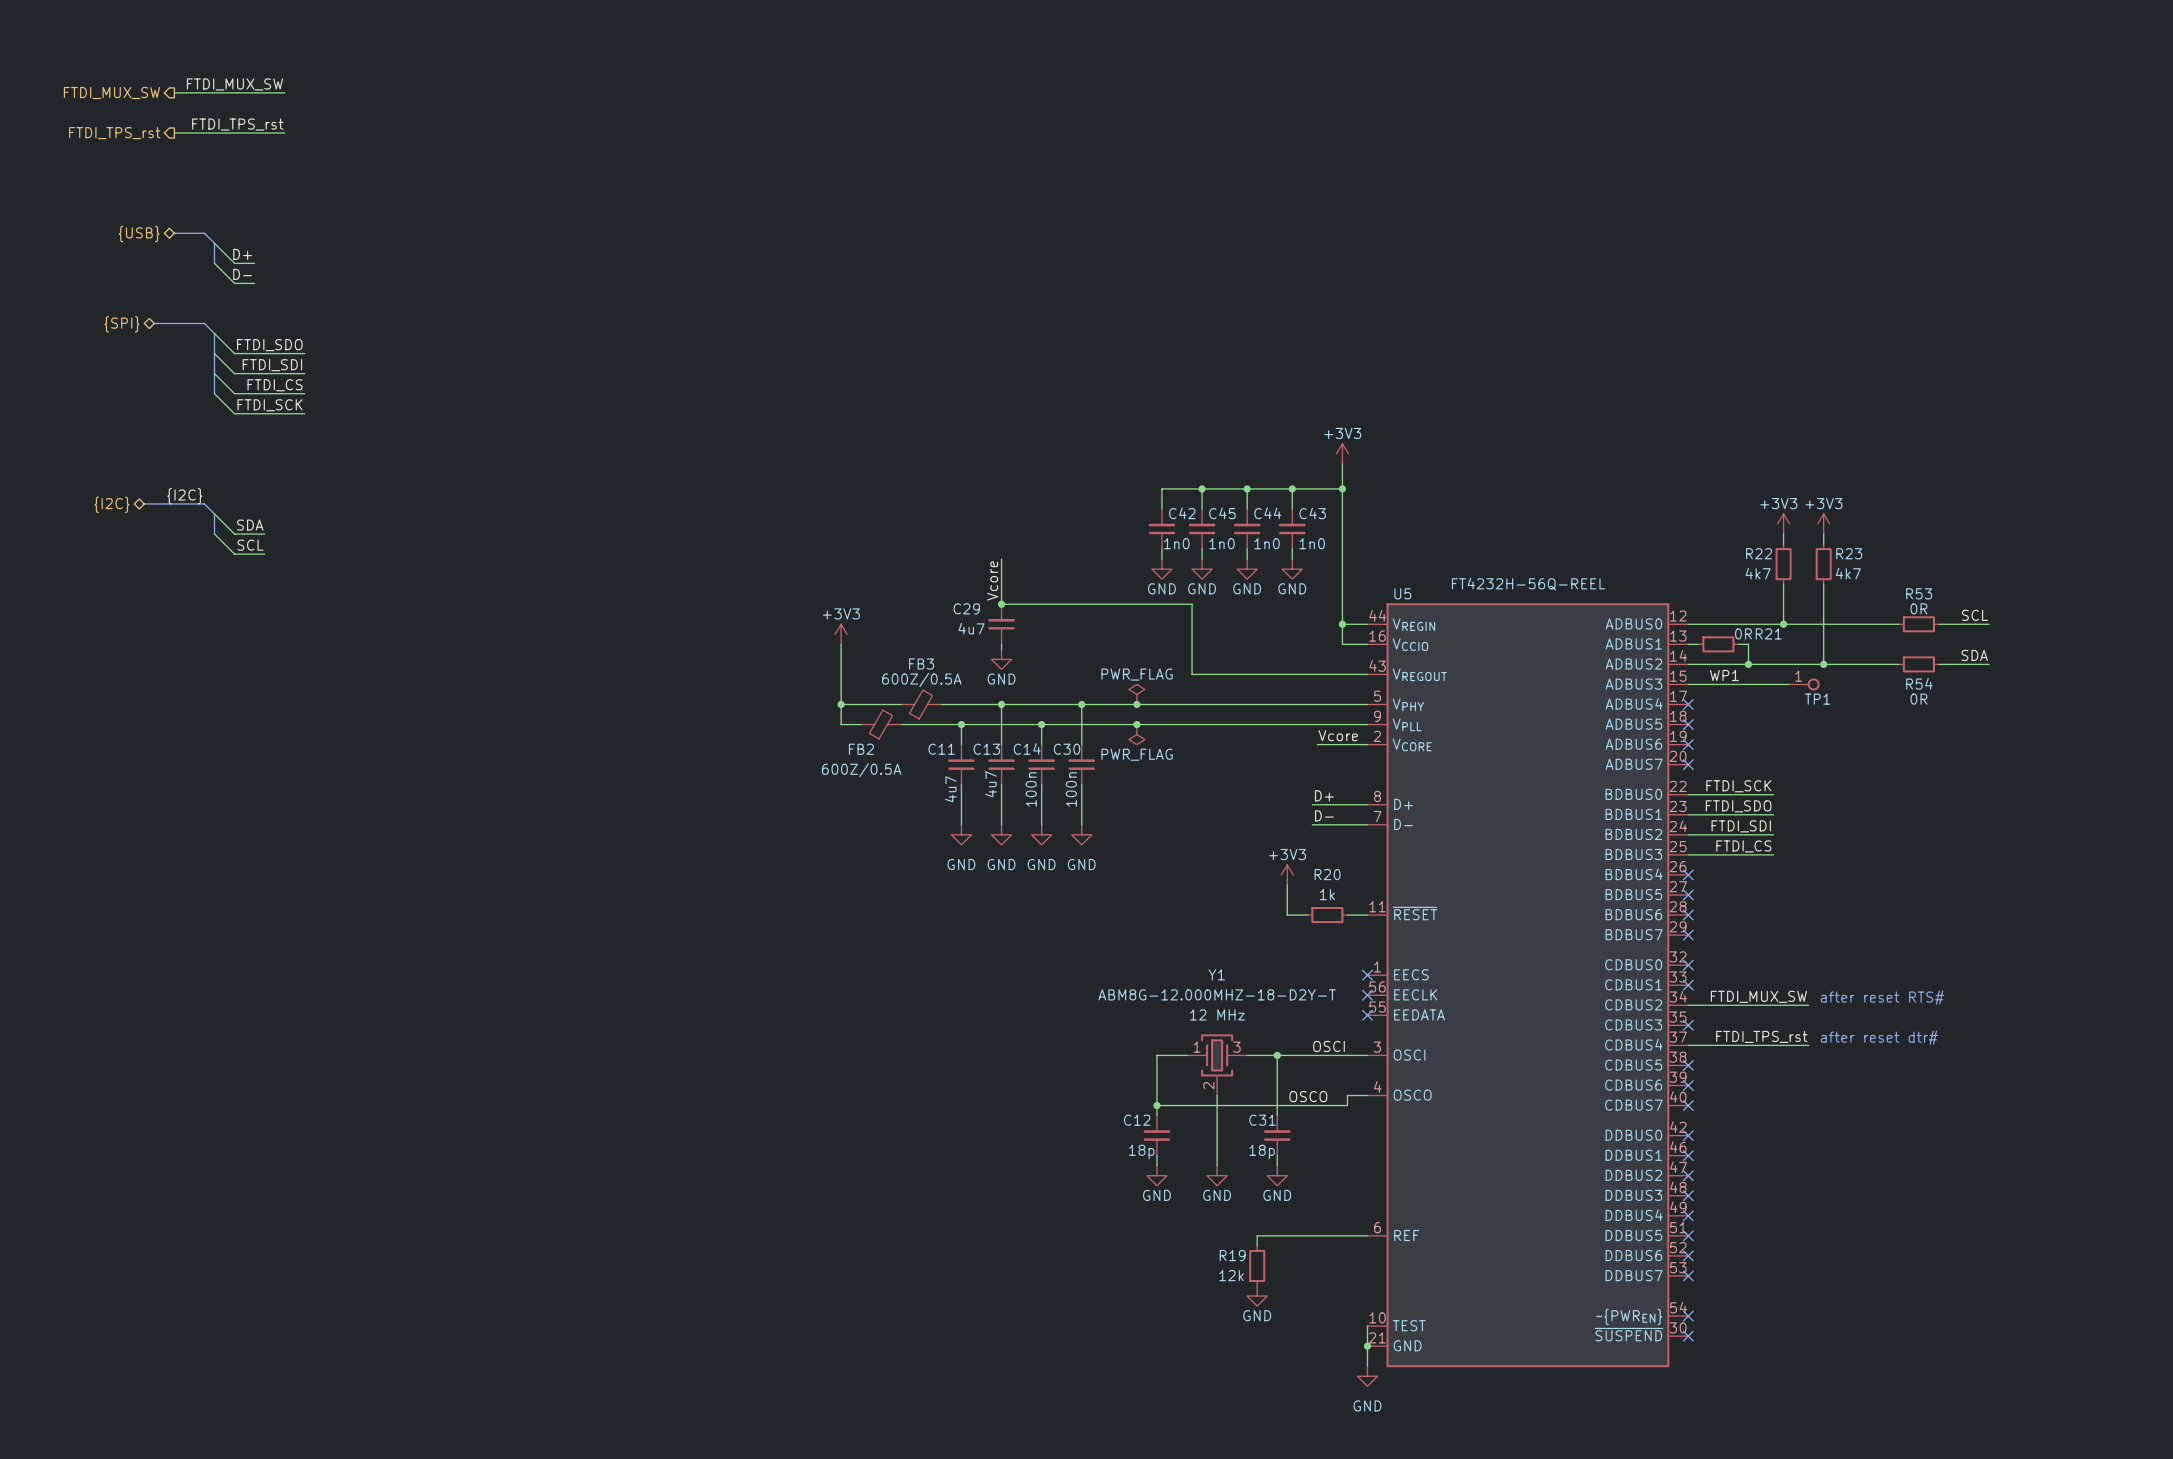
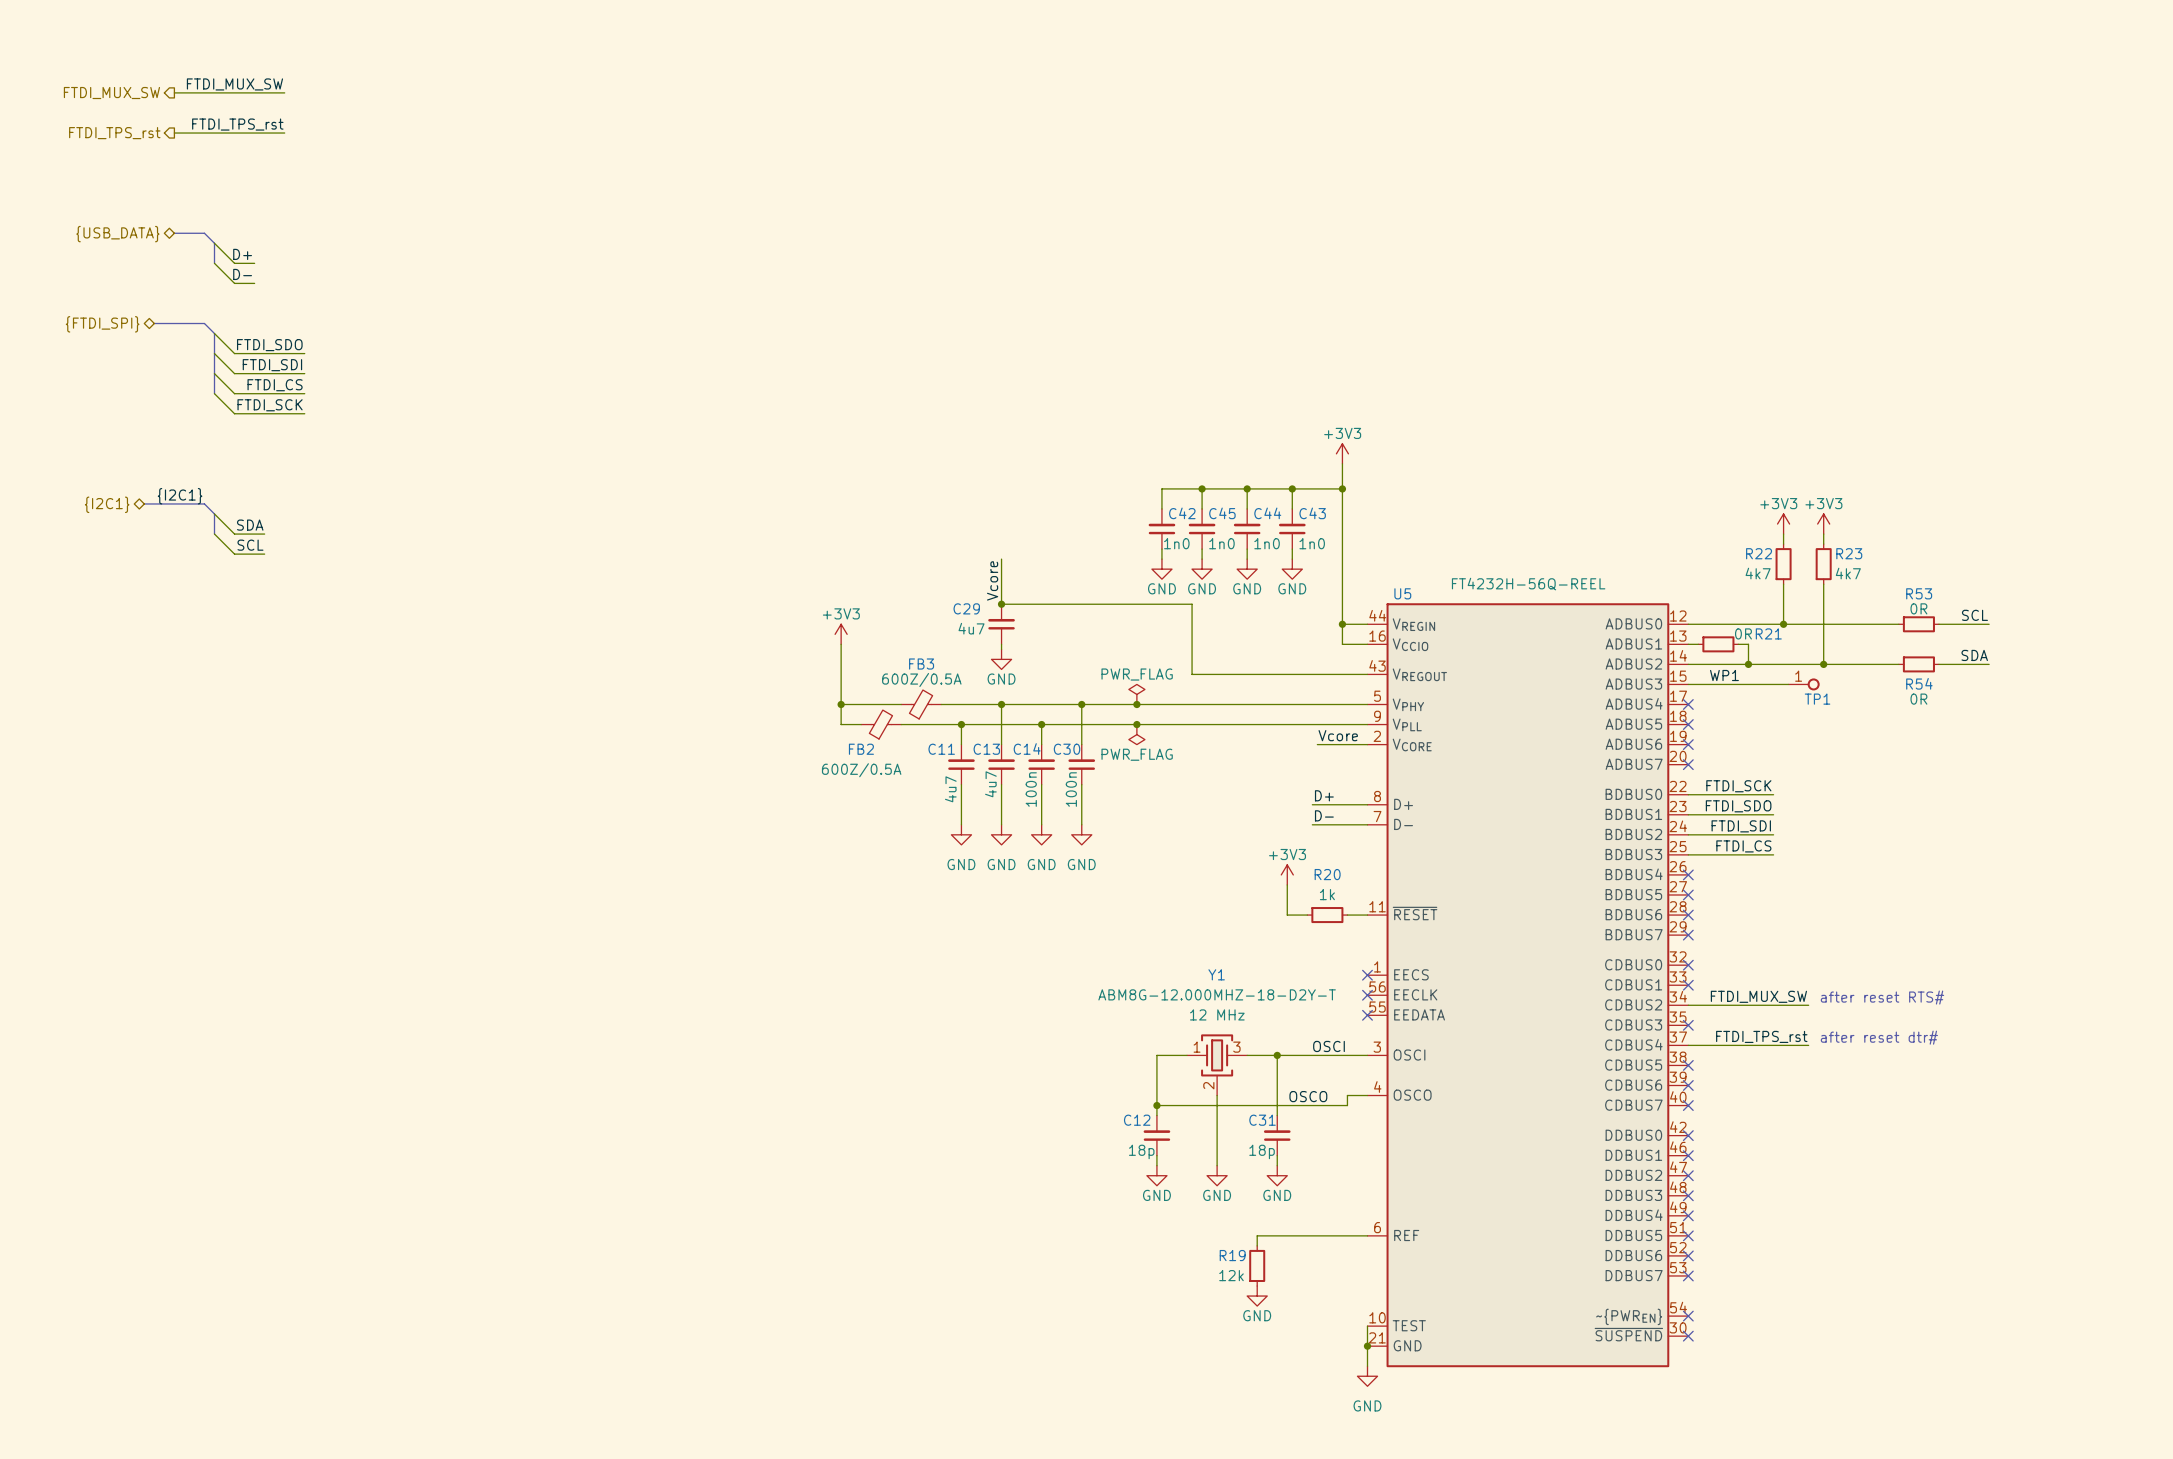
hierarchical label: {USB} (139, 234) -> {USB_DATA} (117, 234)
hierarchical label: {SPI} (121, 324) -> {FTDI_SPI} (102, 324)
label: {I2C} (184, 496) -> {I2C1} (180, 496)
hierarchical label: {I2C} (111, 504) -> {I2C1} (107, 504)

